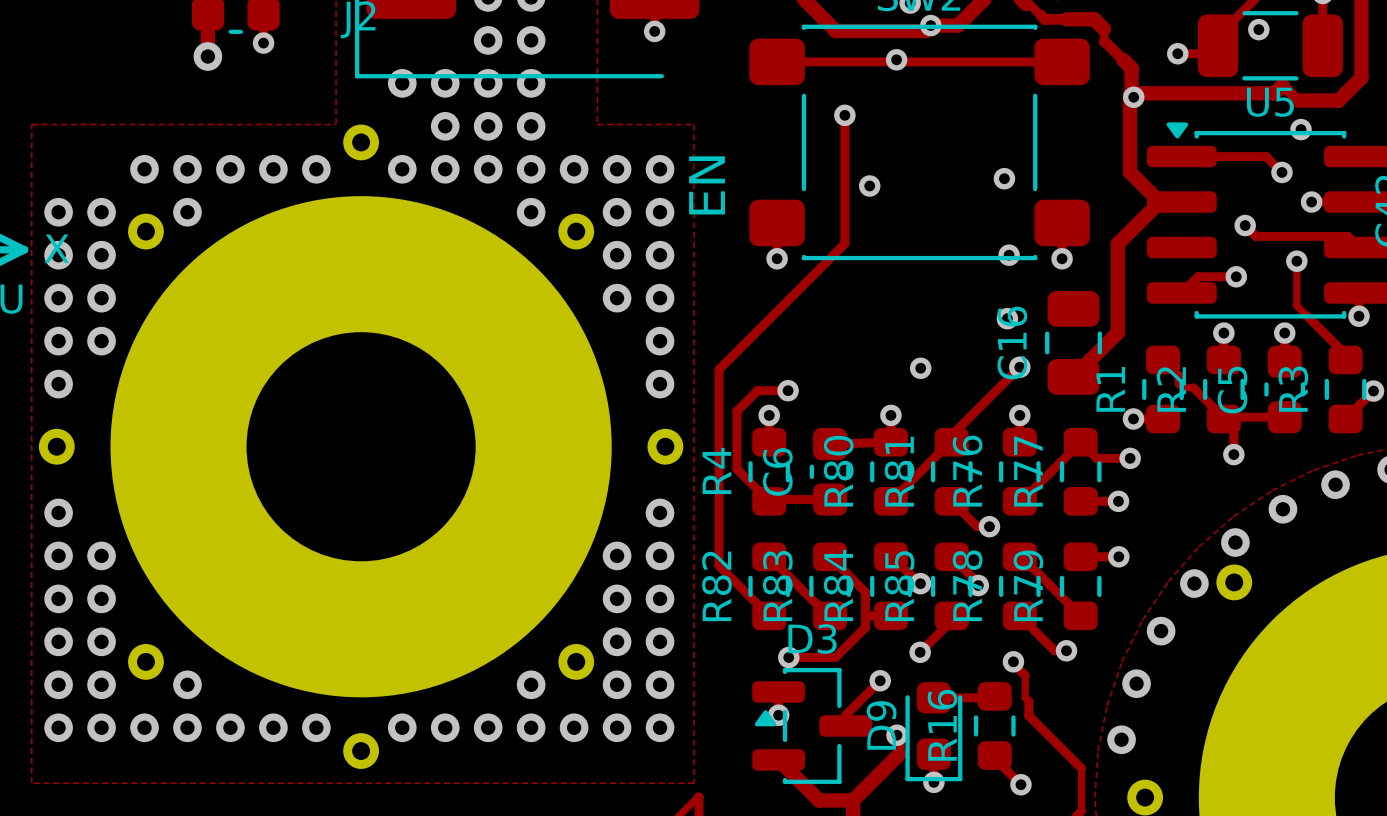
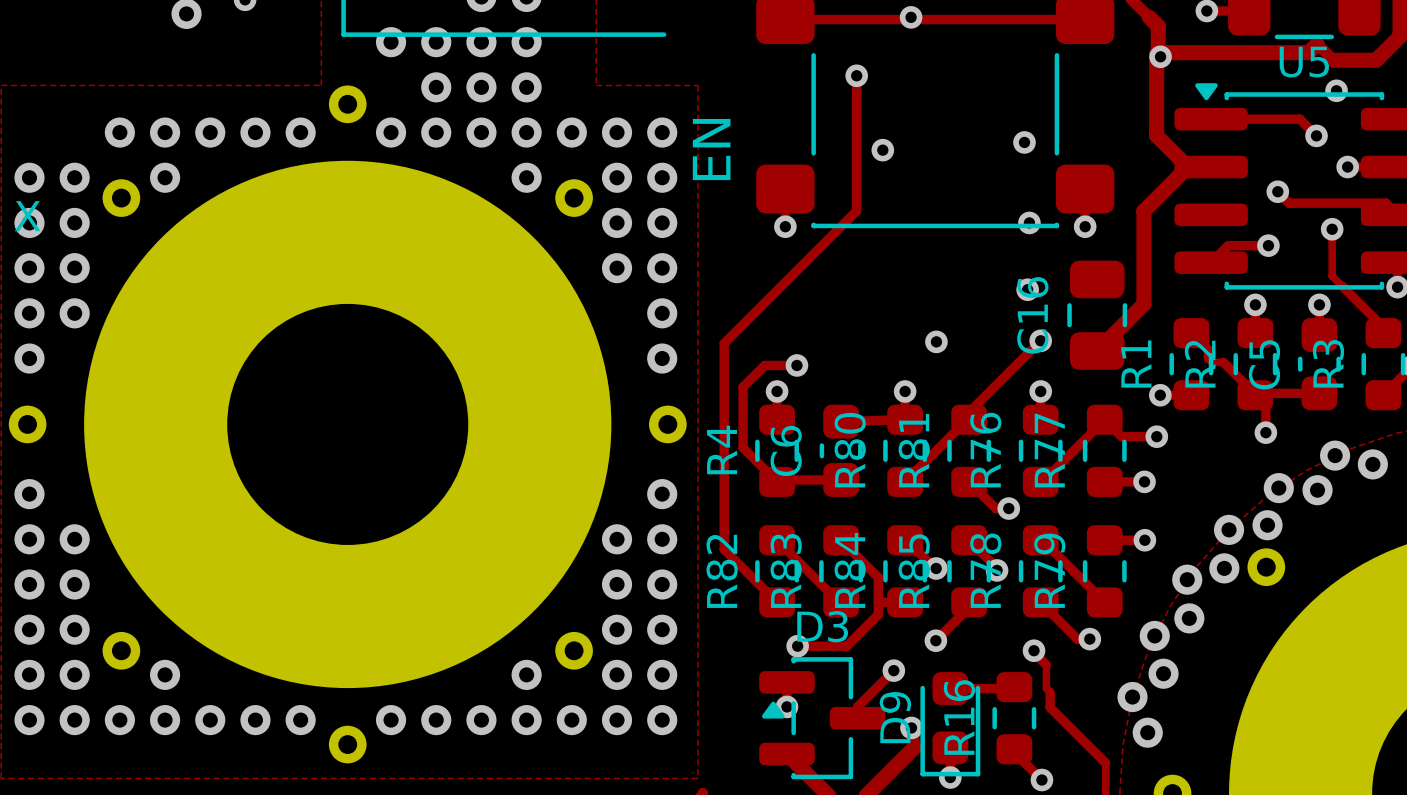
via: none -> (1335, 455)
via: none -> (1278, 488)
via: none -> (1229, 529)
via: none -> (1187, 579)
via: none -> (1154, 635)
via: none -> (1132, 697)

